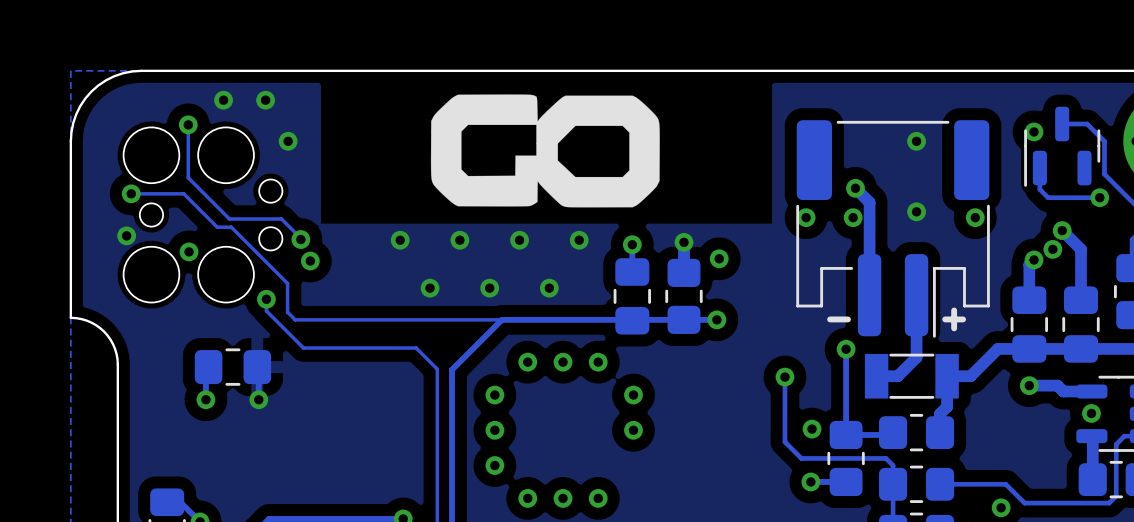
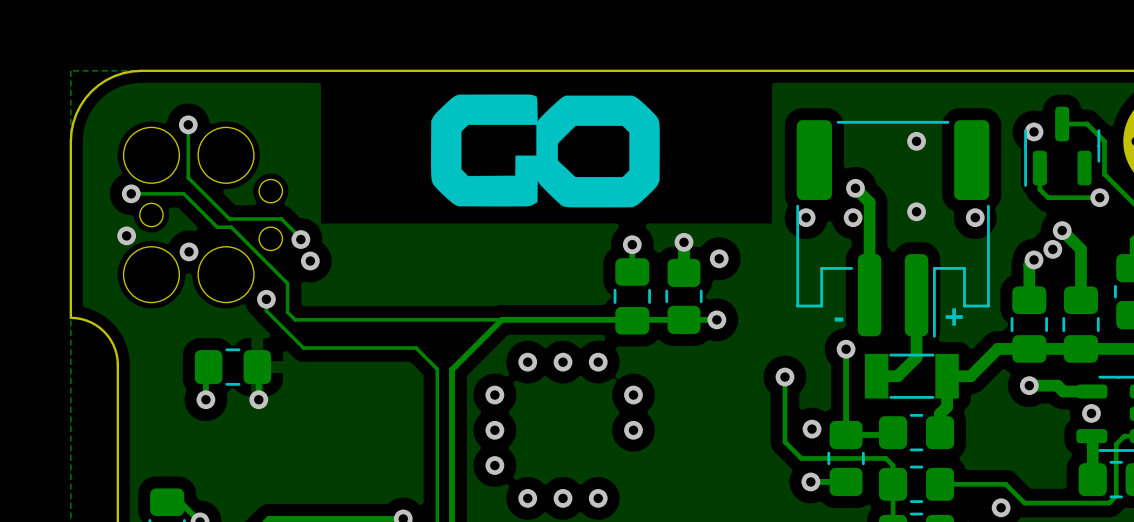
via: (223, 100) -> none
via: (265, 100) -> none
via: (288, 141) -> none
via: (400, 240) -> none
via: (459, 240) -> none
via: (519, 240) -> none
via: (579, 240) -> none
via: (430, 288) -> none
via: (489, 288) -> none
via: (549, 288) -> none

